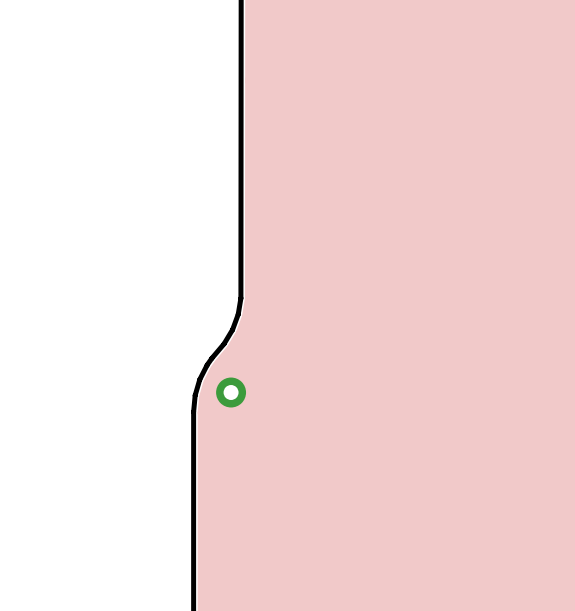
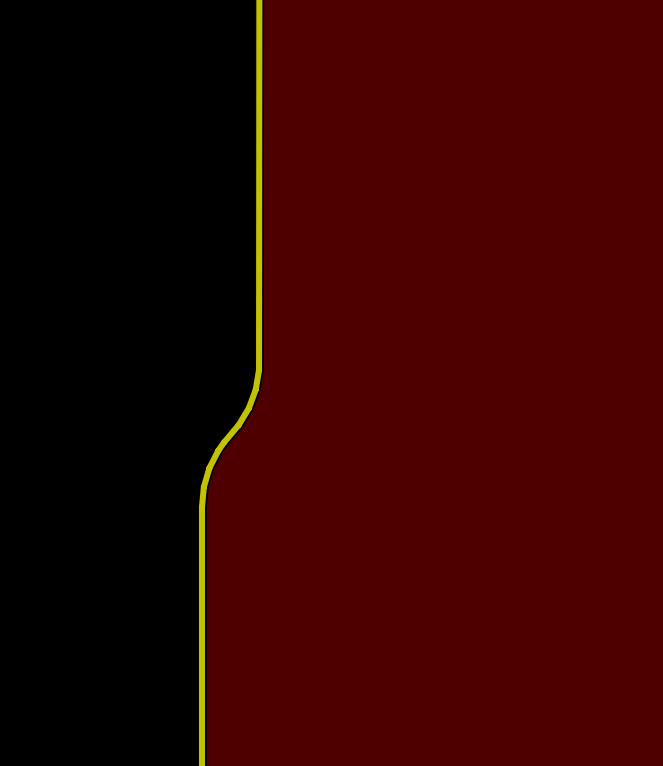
via: (231, 392) -> none

